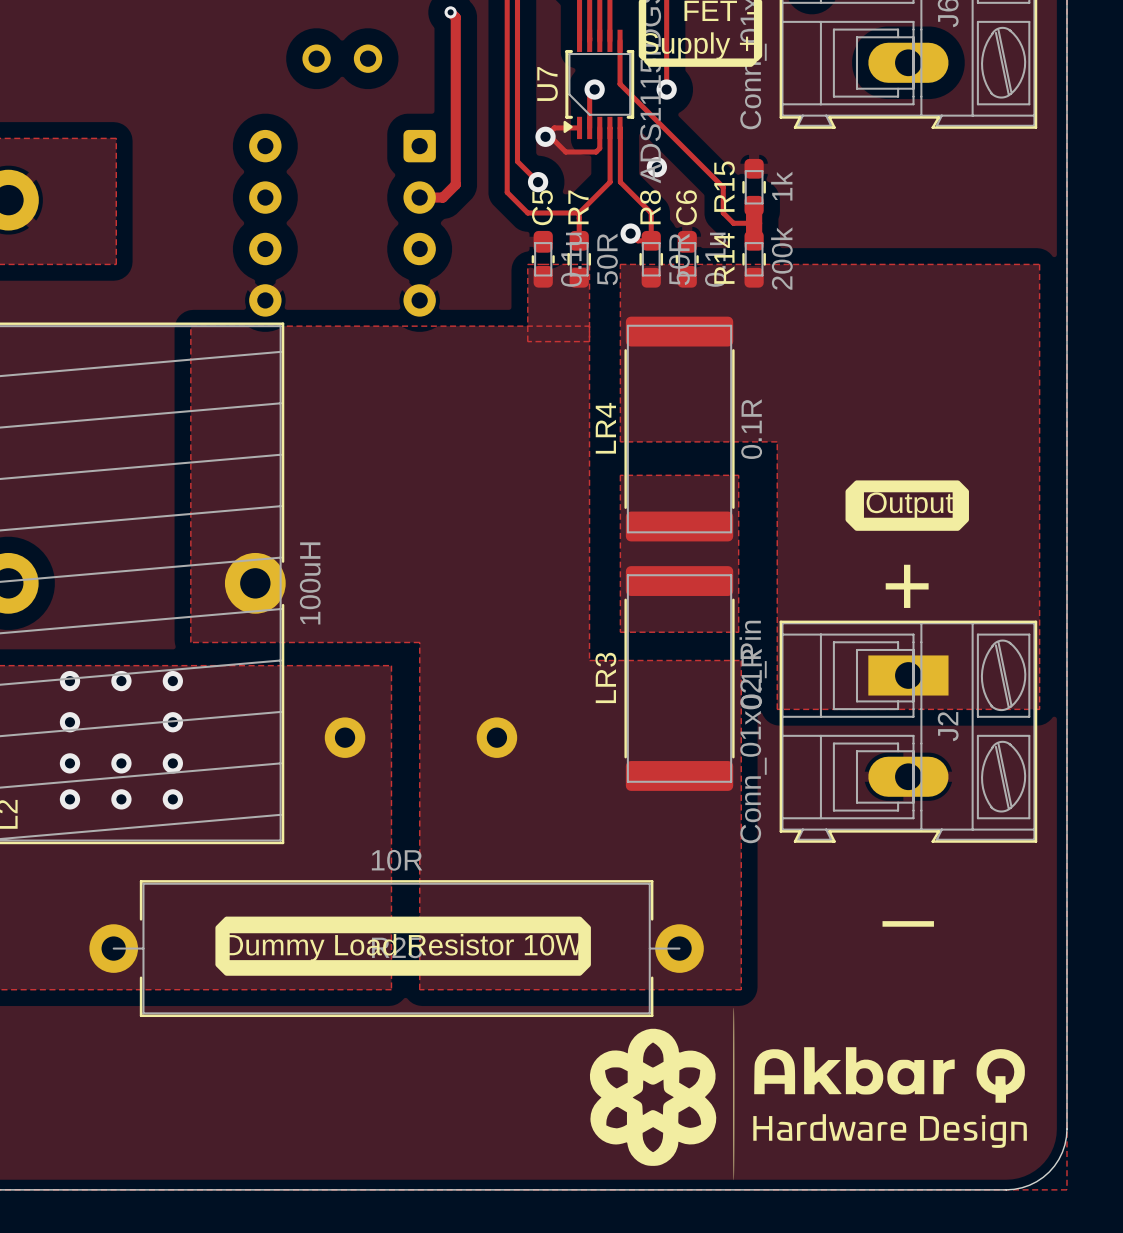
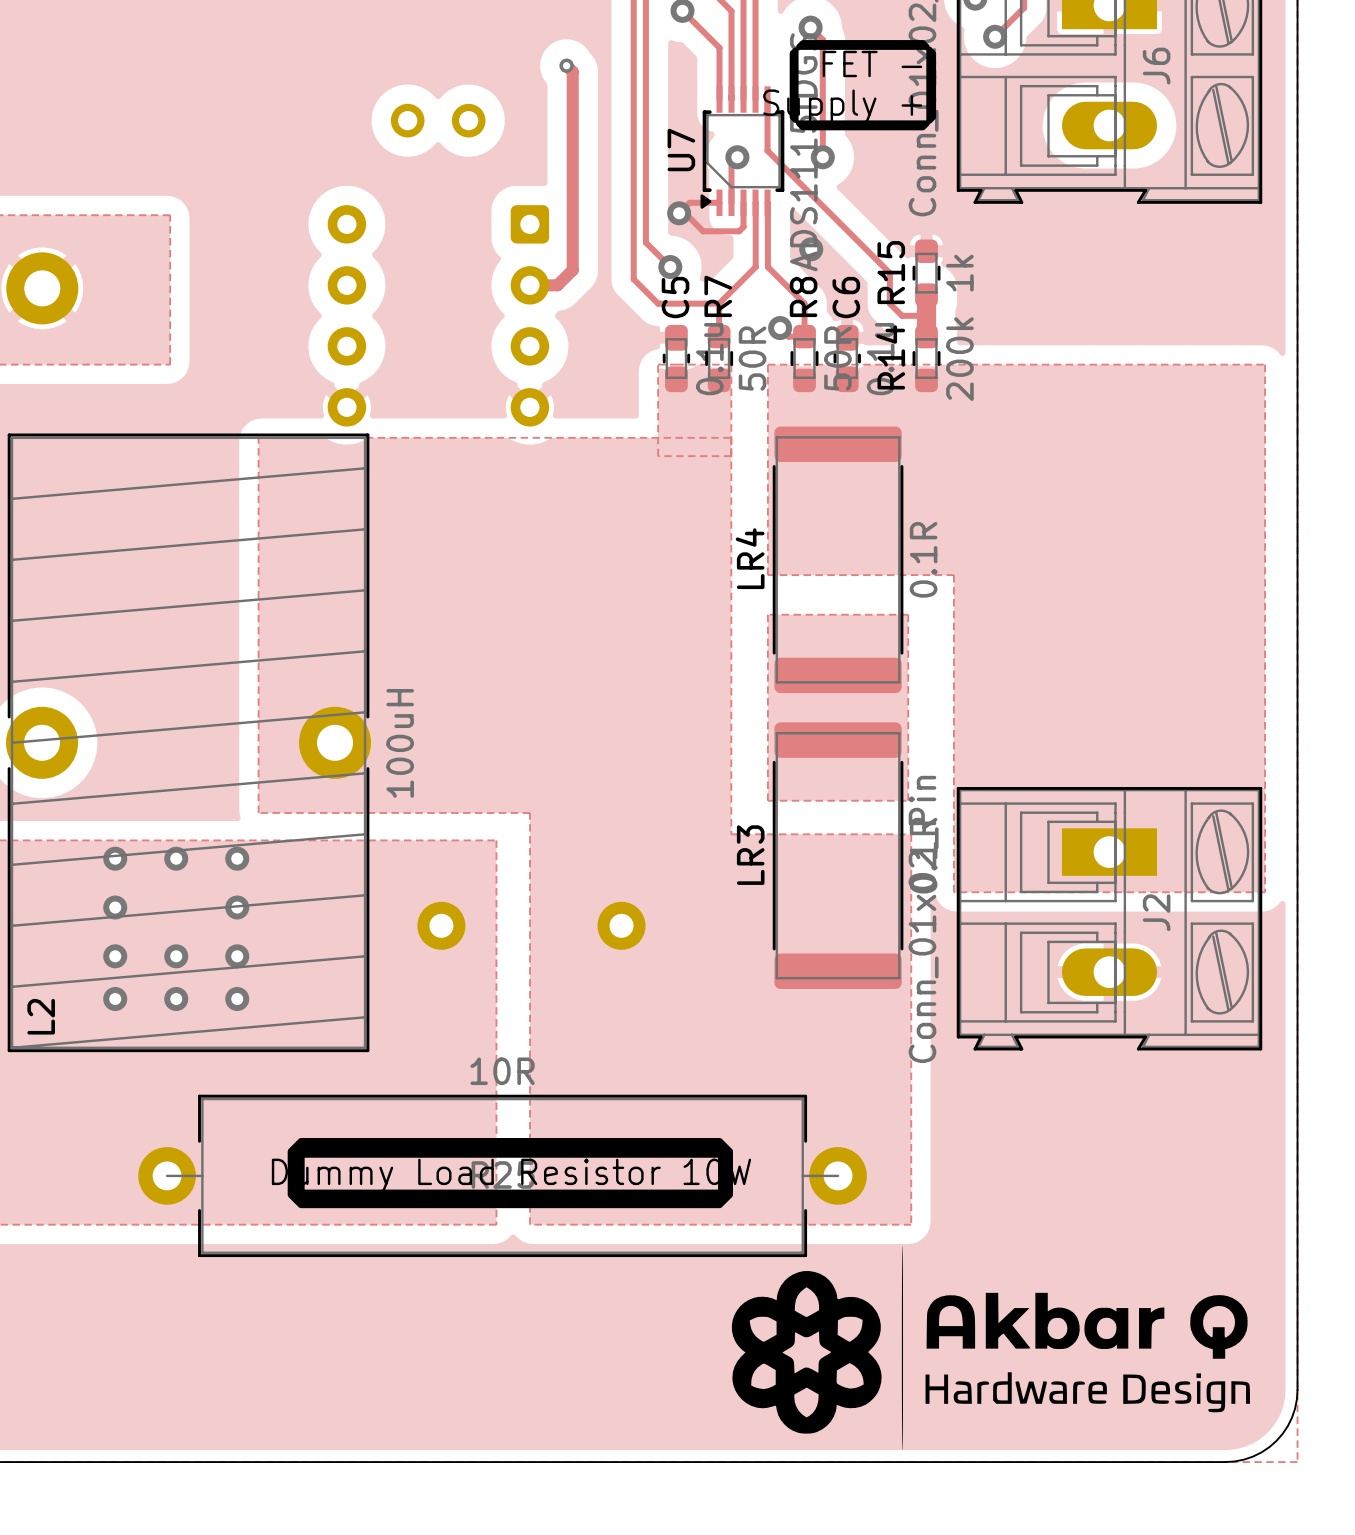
drawing: [845, 480, 969, 531] -> none
text: Output (909, 505) -> none
text: + (907, 586) -> none
text: _ (908, 923) -> none

